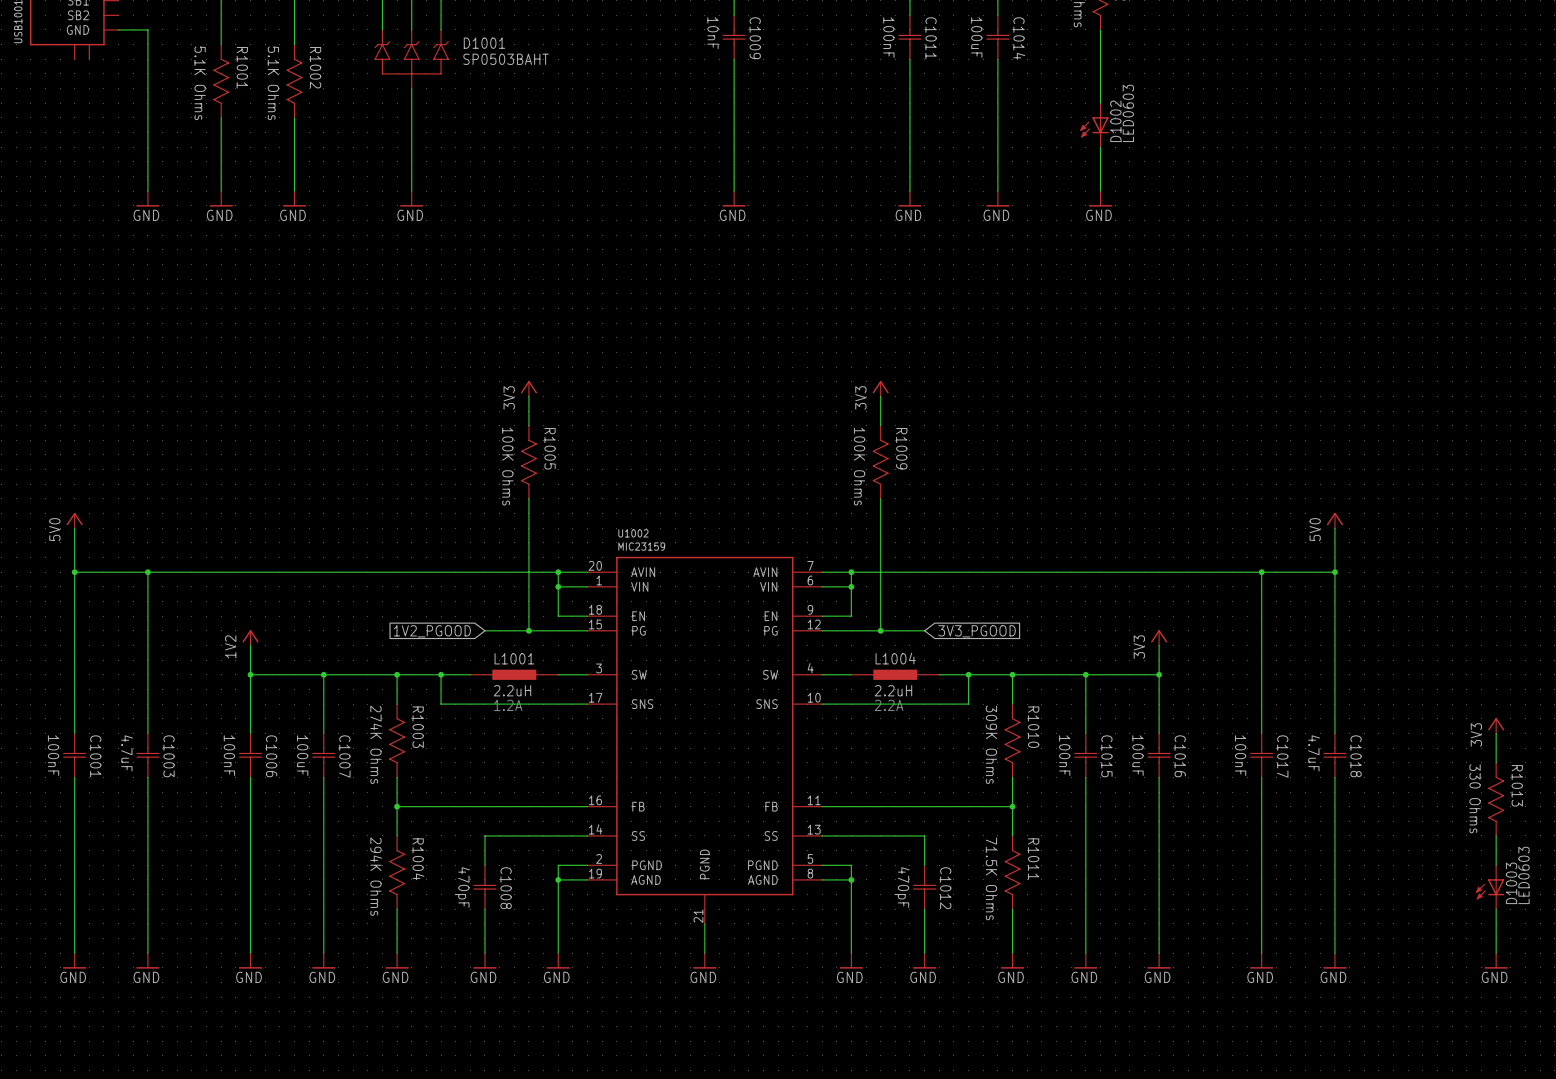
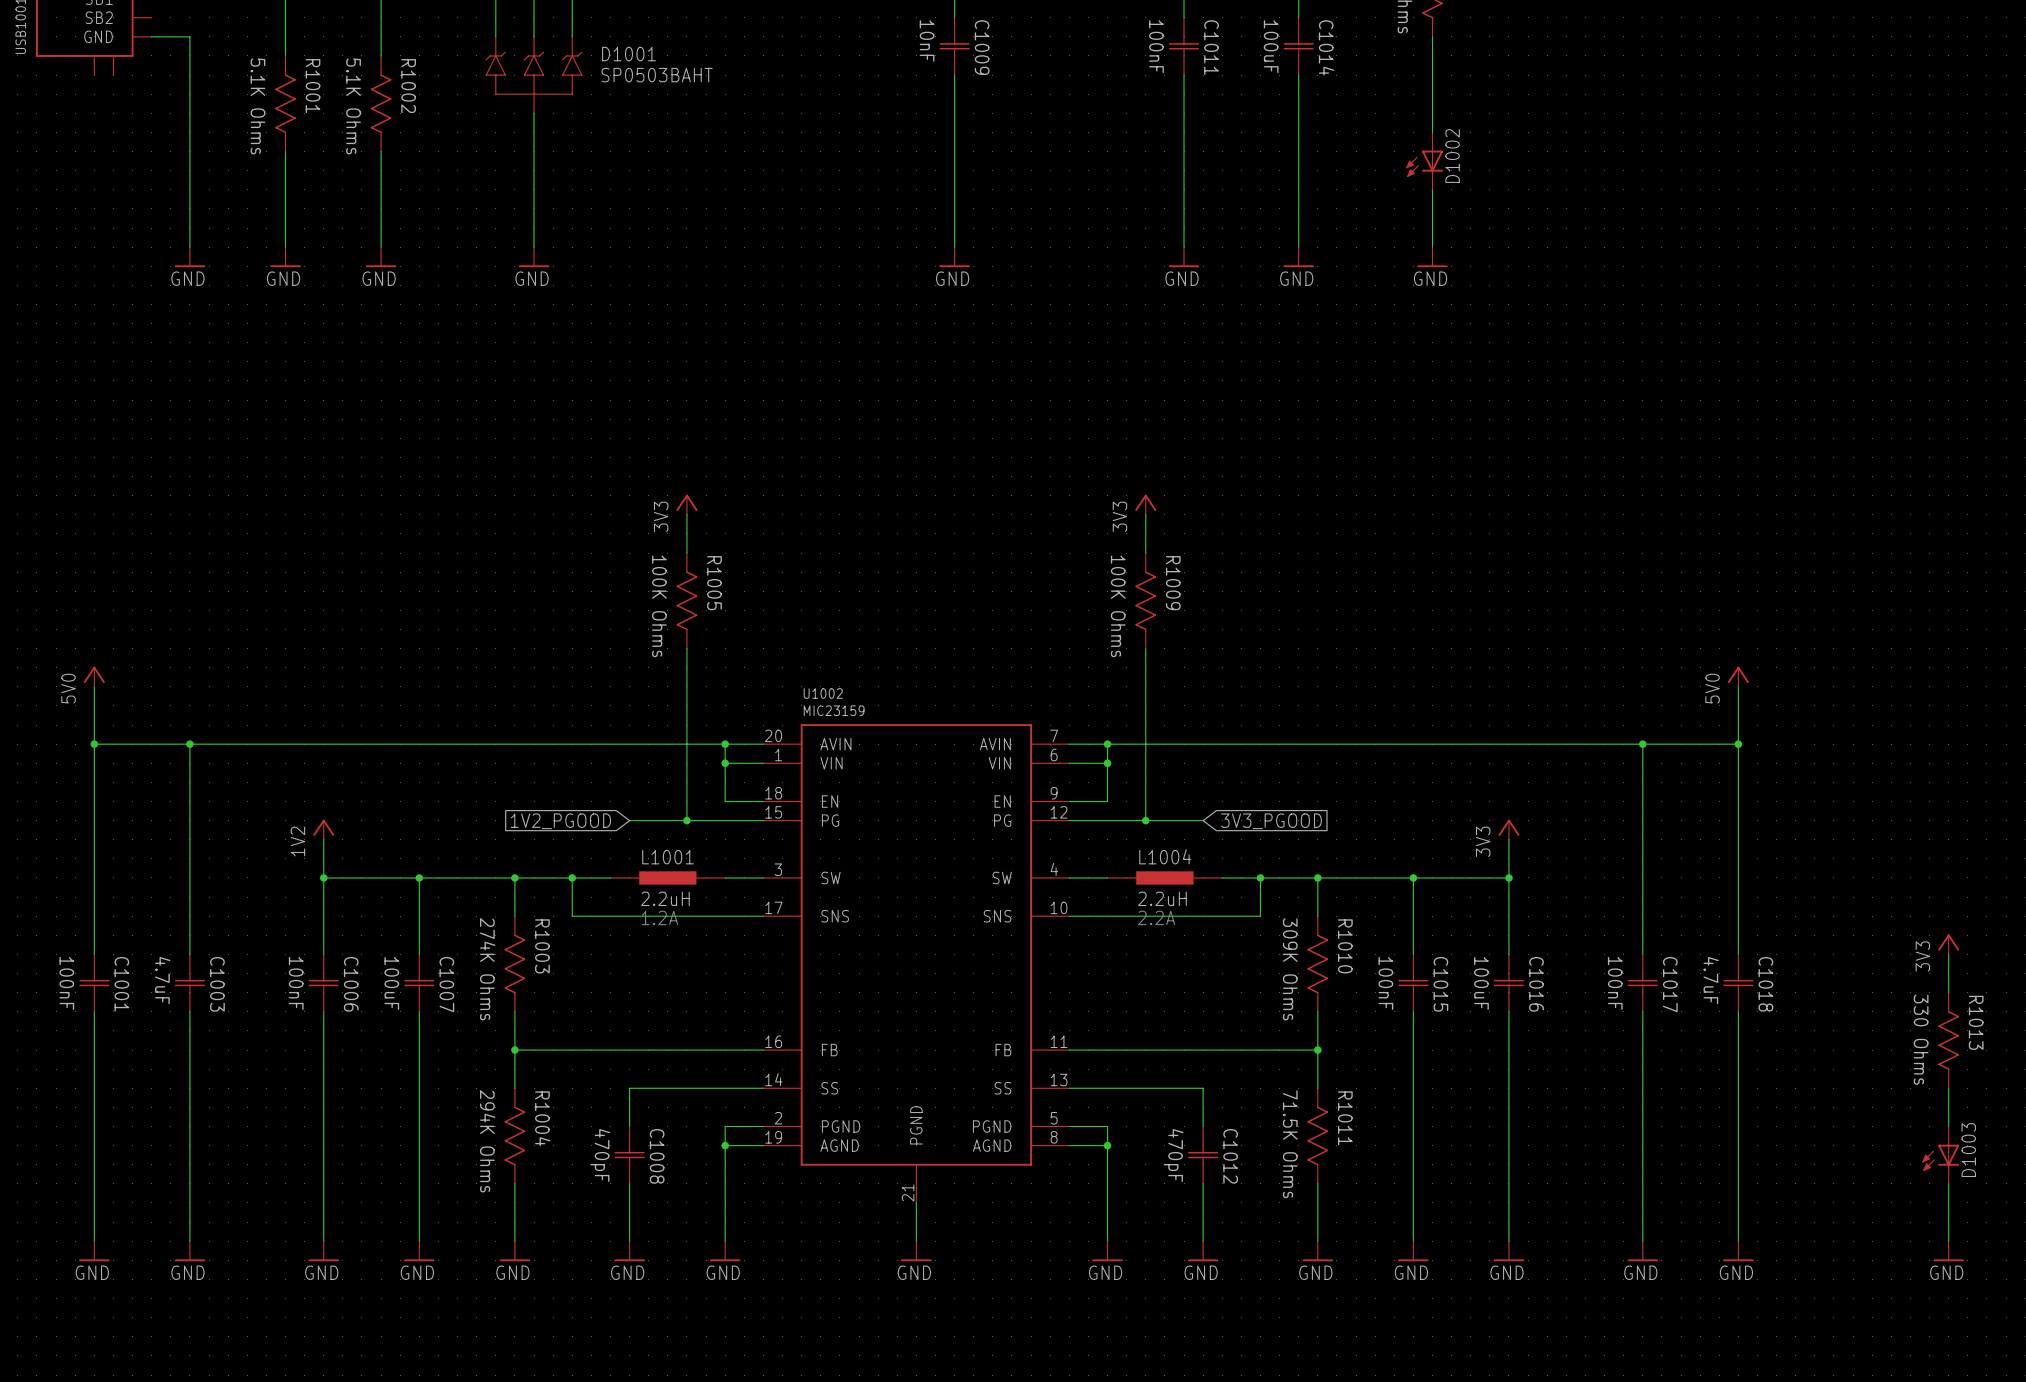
D1002 value: LED0603 (1128, 113) -> none
D1003 value: LED0603 (1524, 875) -> none

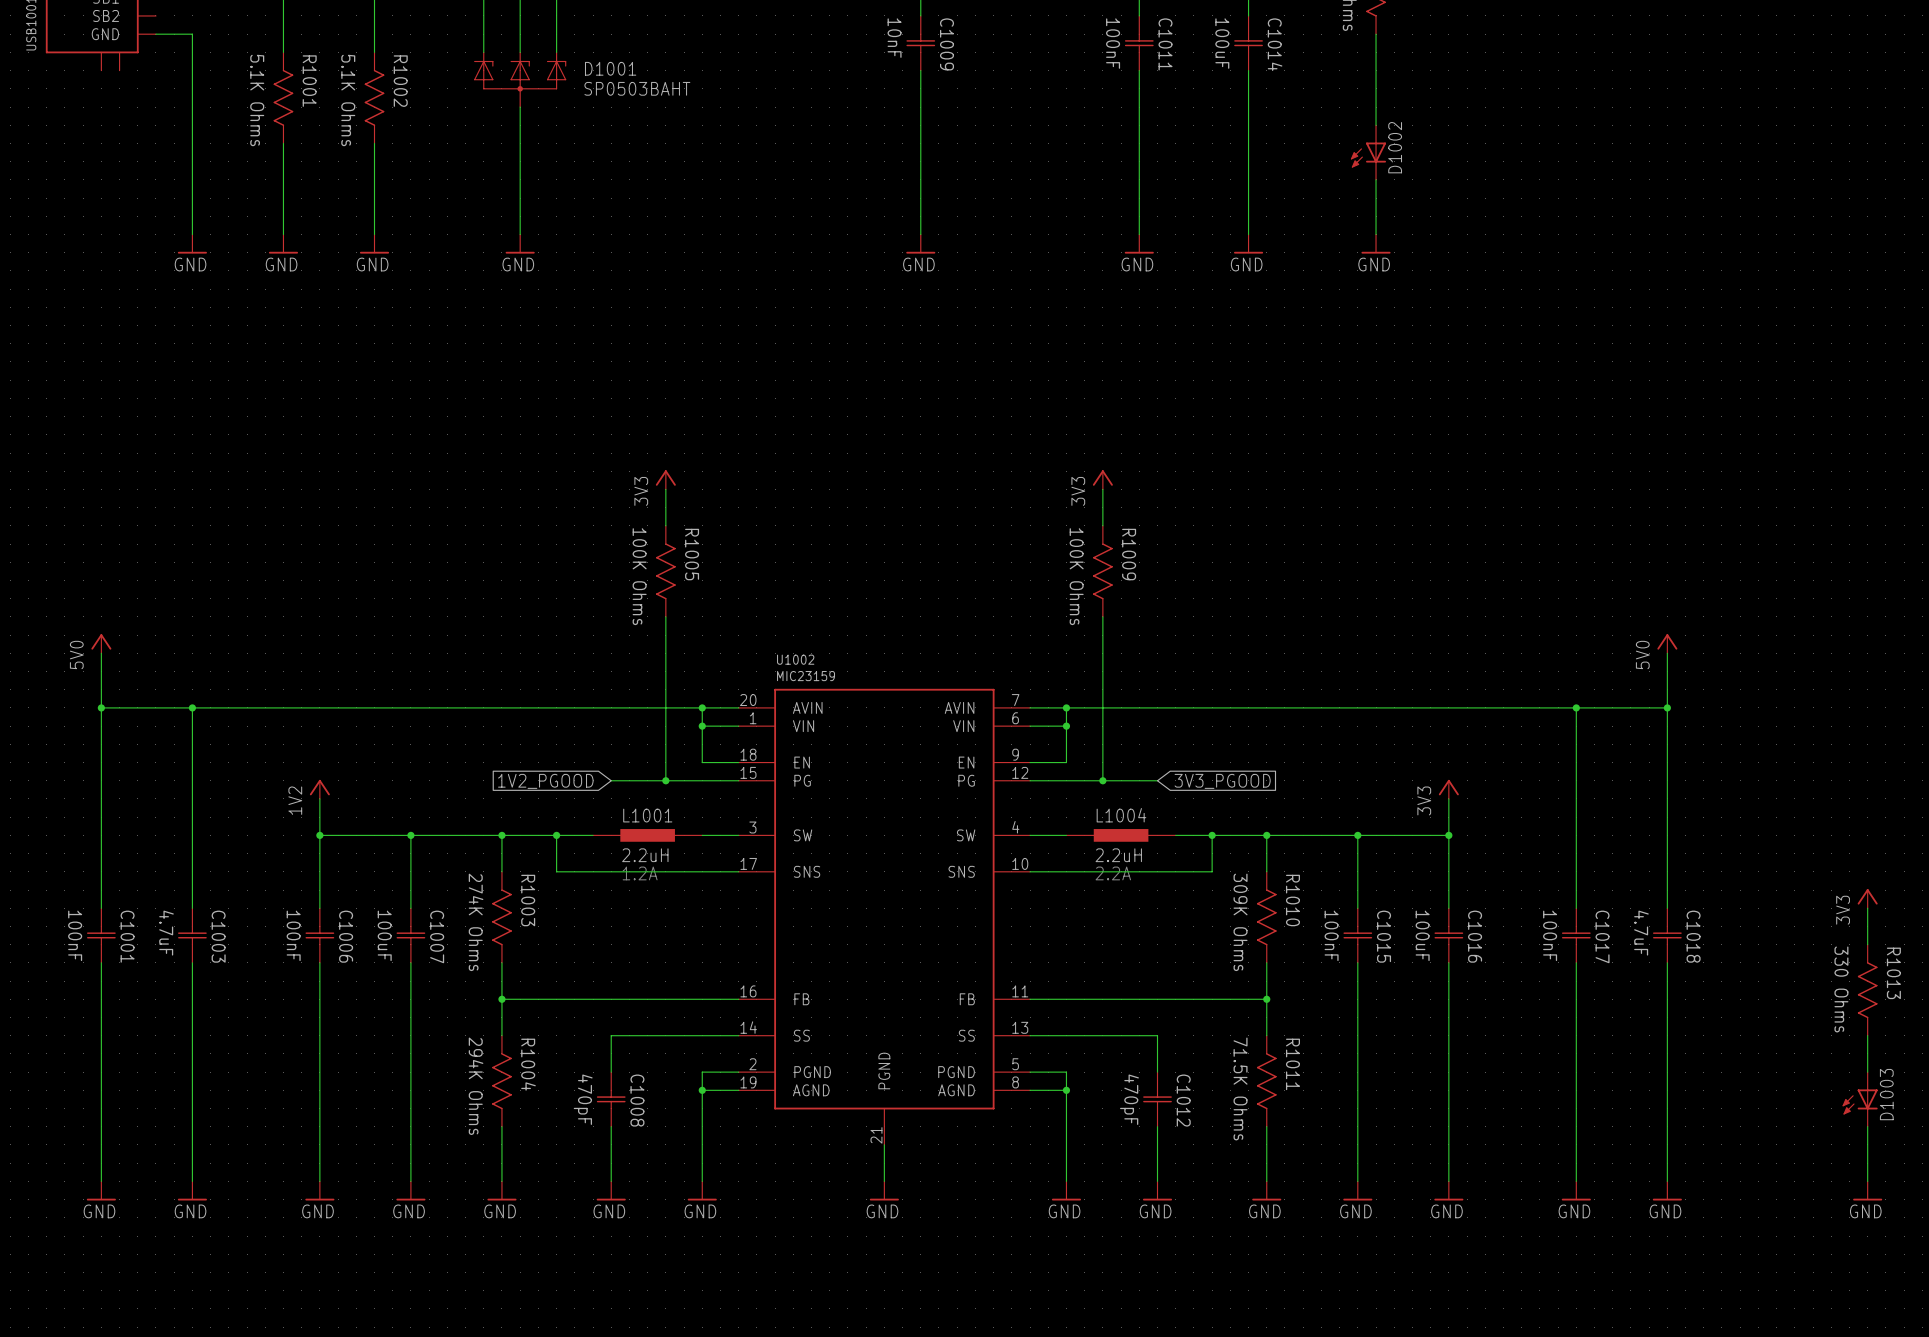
D1001 symbol: [485, 36, 583, 114] -> [474, 52, 567, 108]

